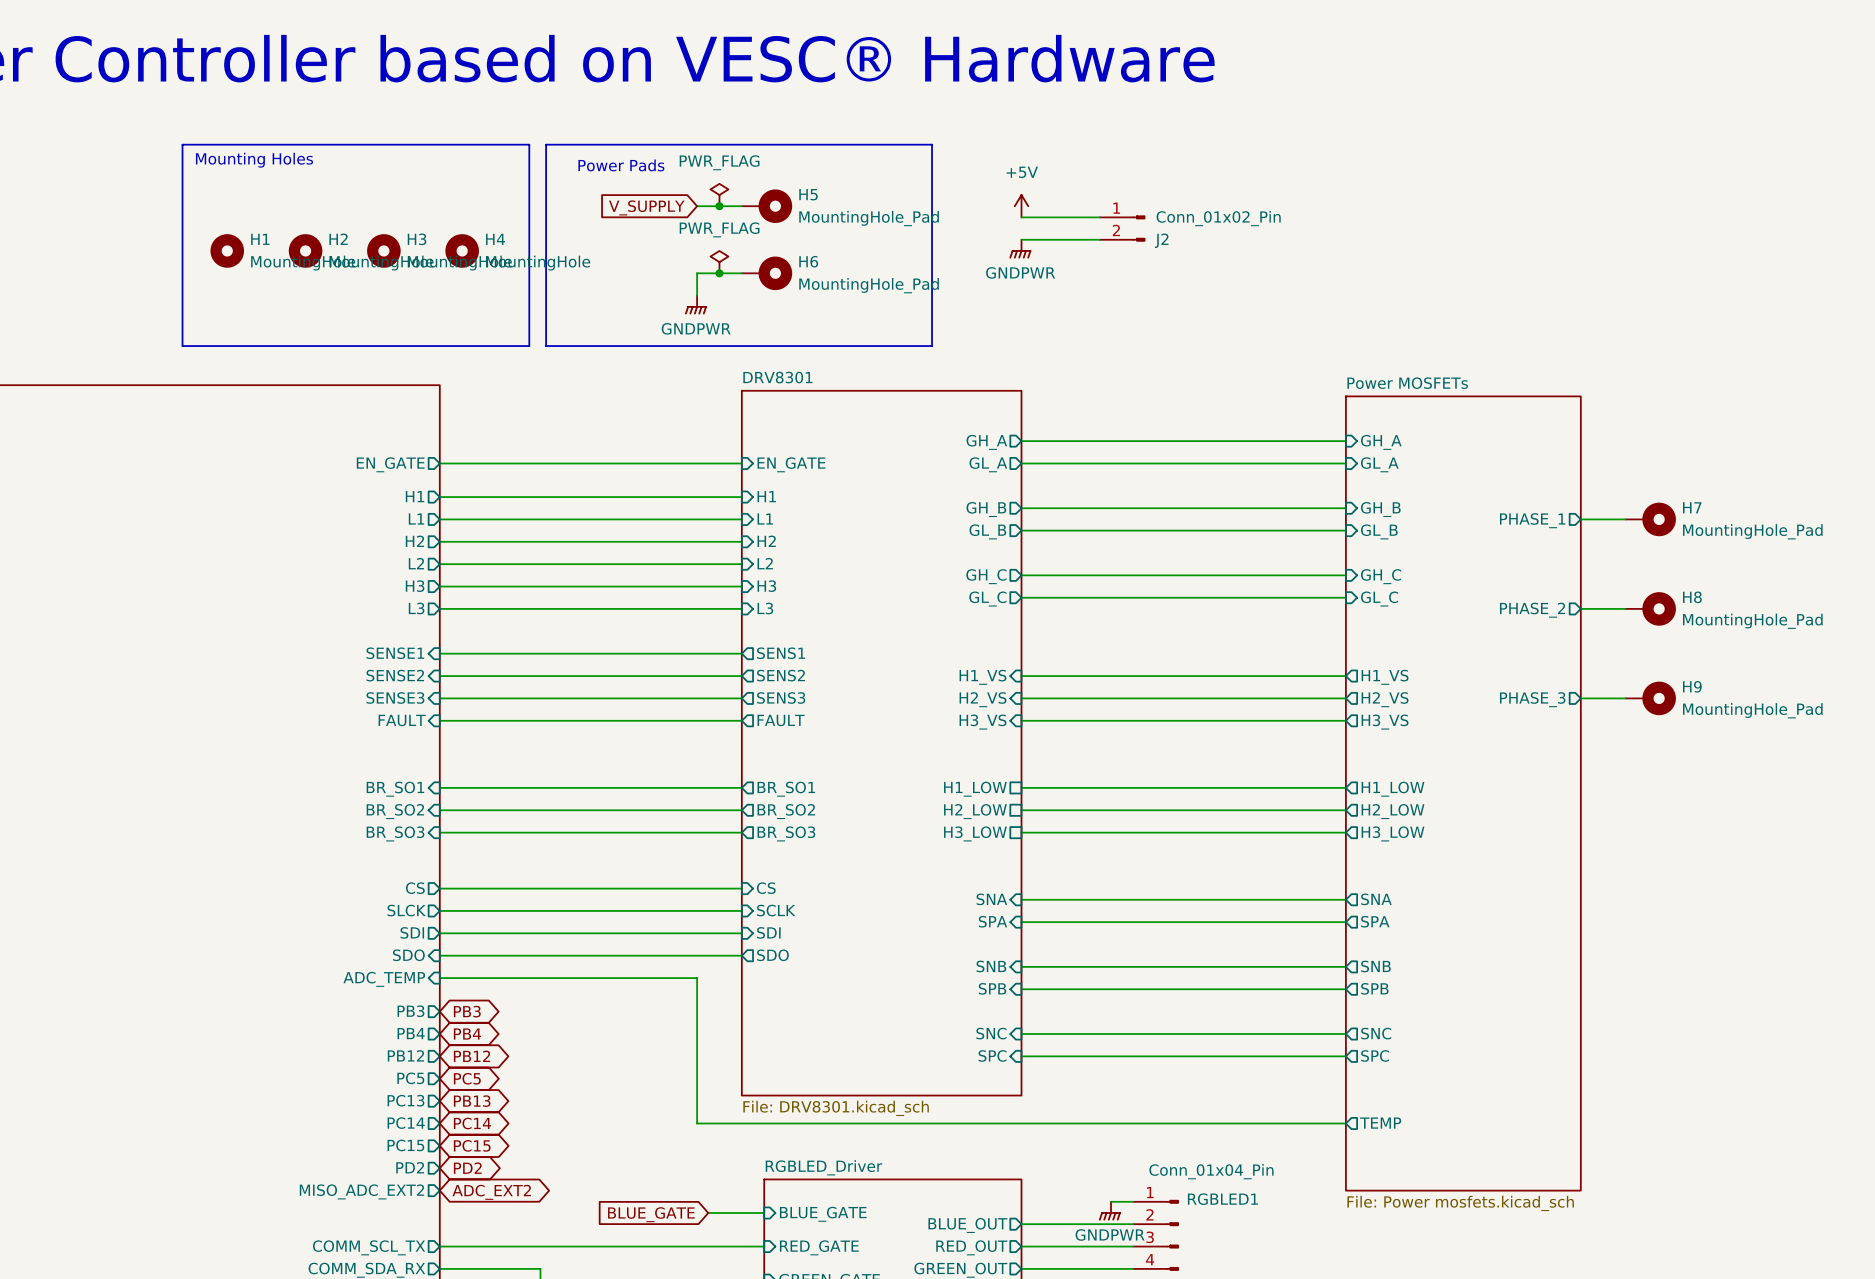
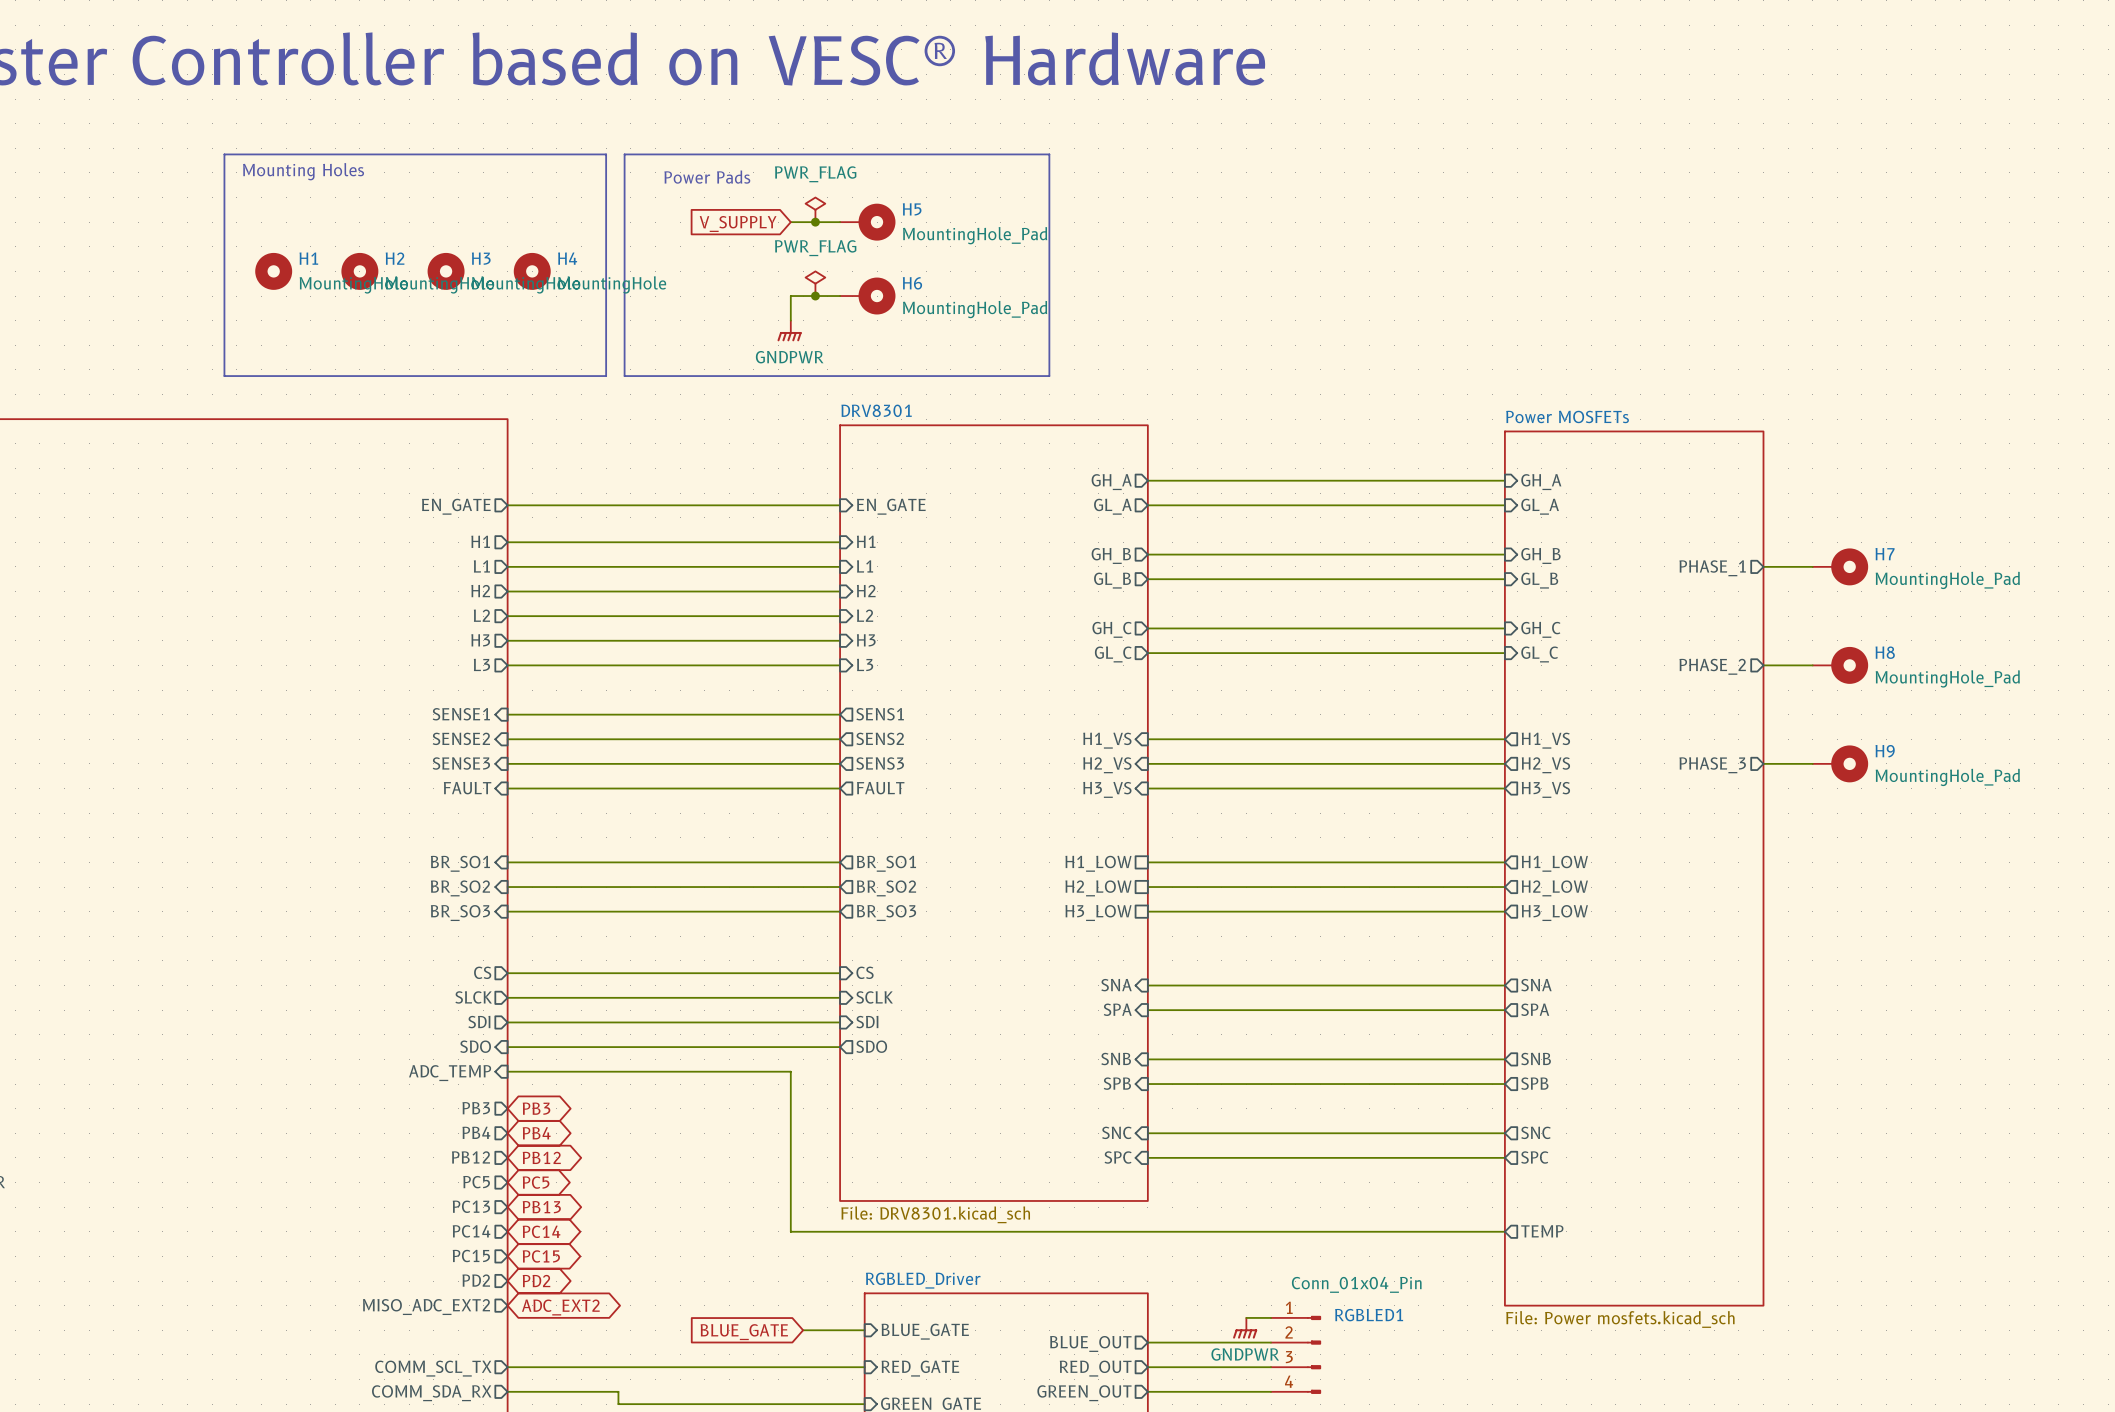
power symbol: +5V (1021, 206) -> none
wire: (1021, 217) (1099, 217) -> none
J2: Conn_01x02_Pin (1122, 228) -> none
wire: (1021, 239) (1099, 239) -> none
power symbol: GNDPWR (1020, 249) -> none

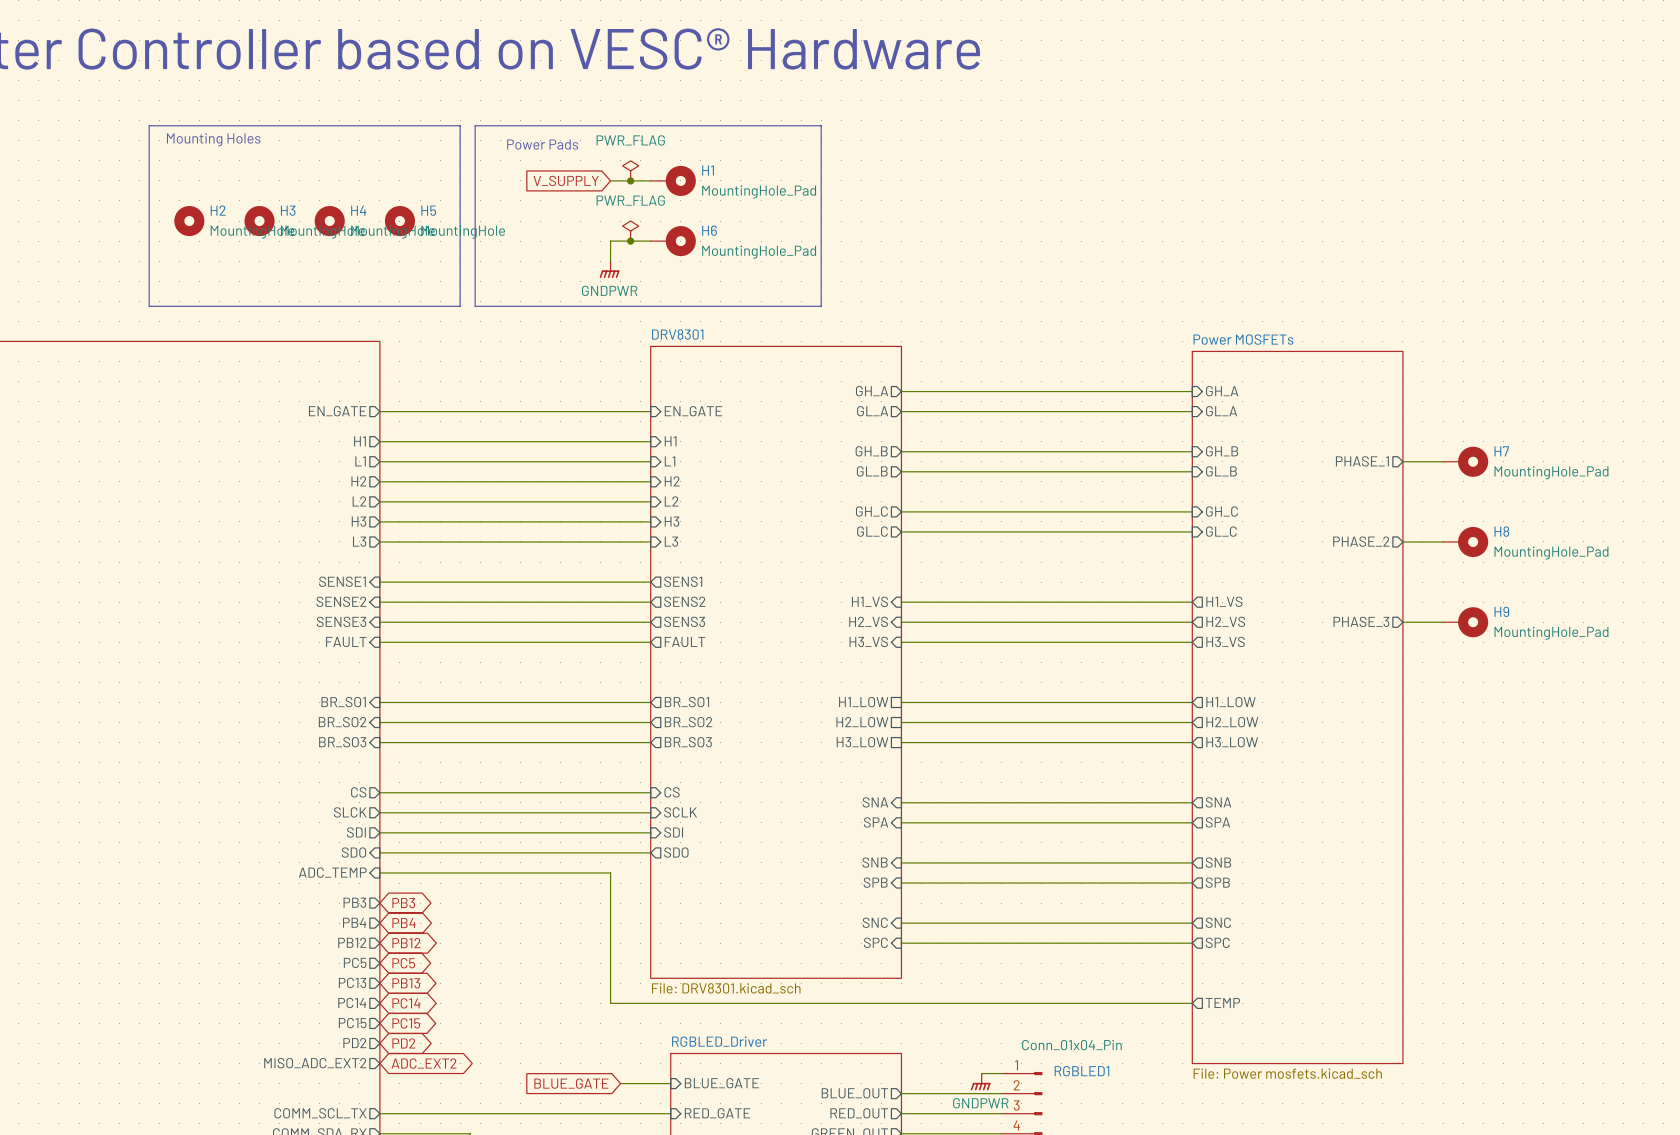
H5 name: H5 (912, 209) -> H1 (708, 170)
H1 name: H1 (308, 258) -> H2 (218, 210)
H2 name: H2 (395, 258) -> H3 (288, 210)
H3 name: H3 (481, 258) -> H4 (358, 210)
H4 name: H4 (567, 258) -> H5 (428, 210)

